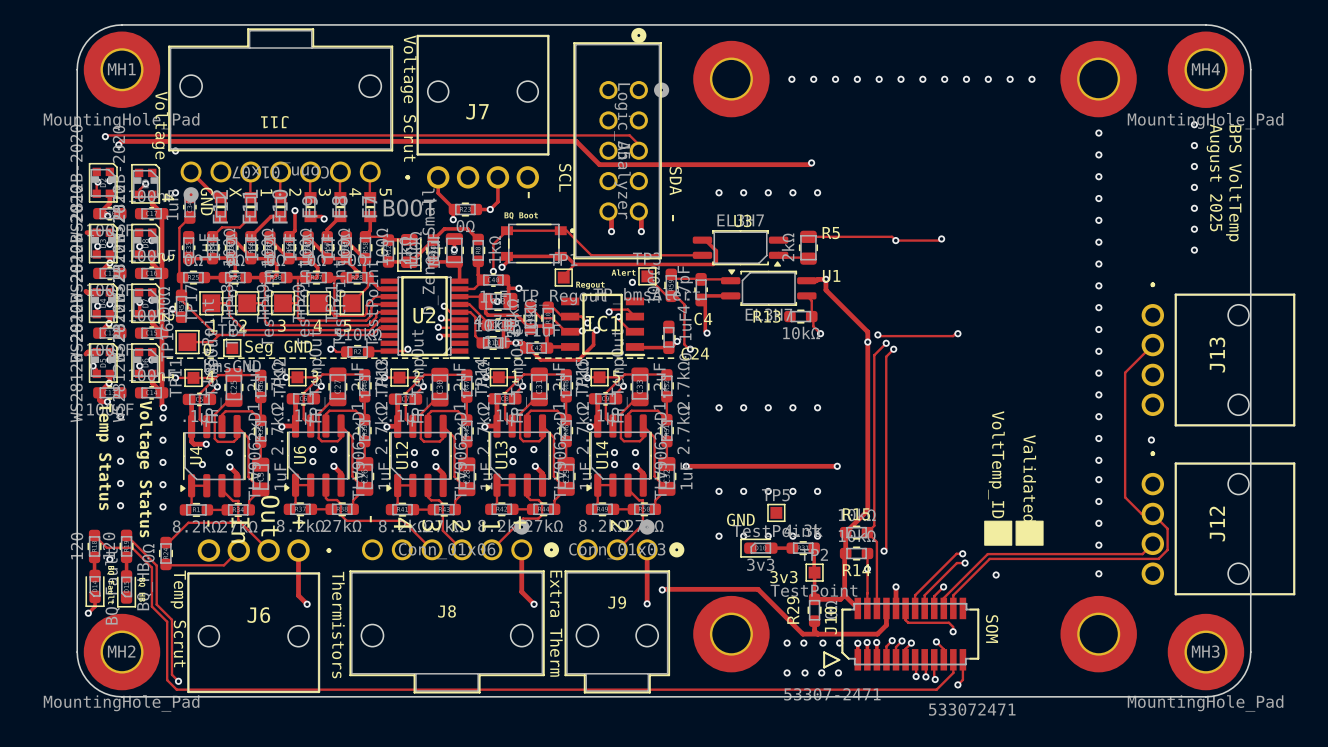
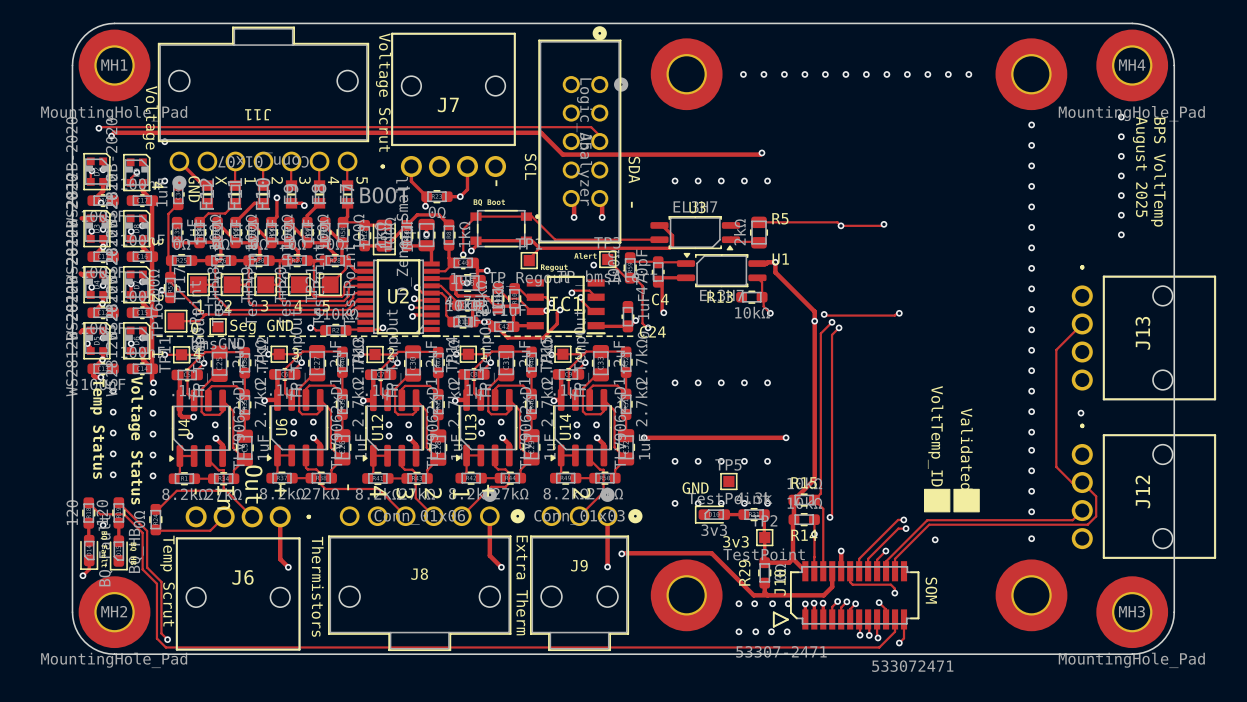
C4 value: 4.7pF (685, 289) -> 470pF (643, 272)

